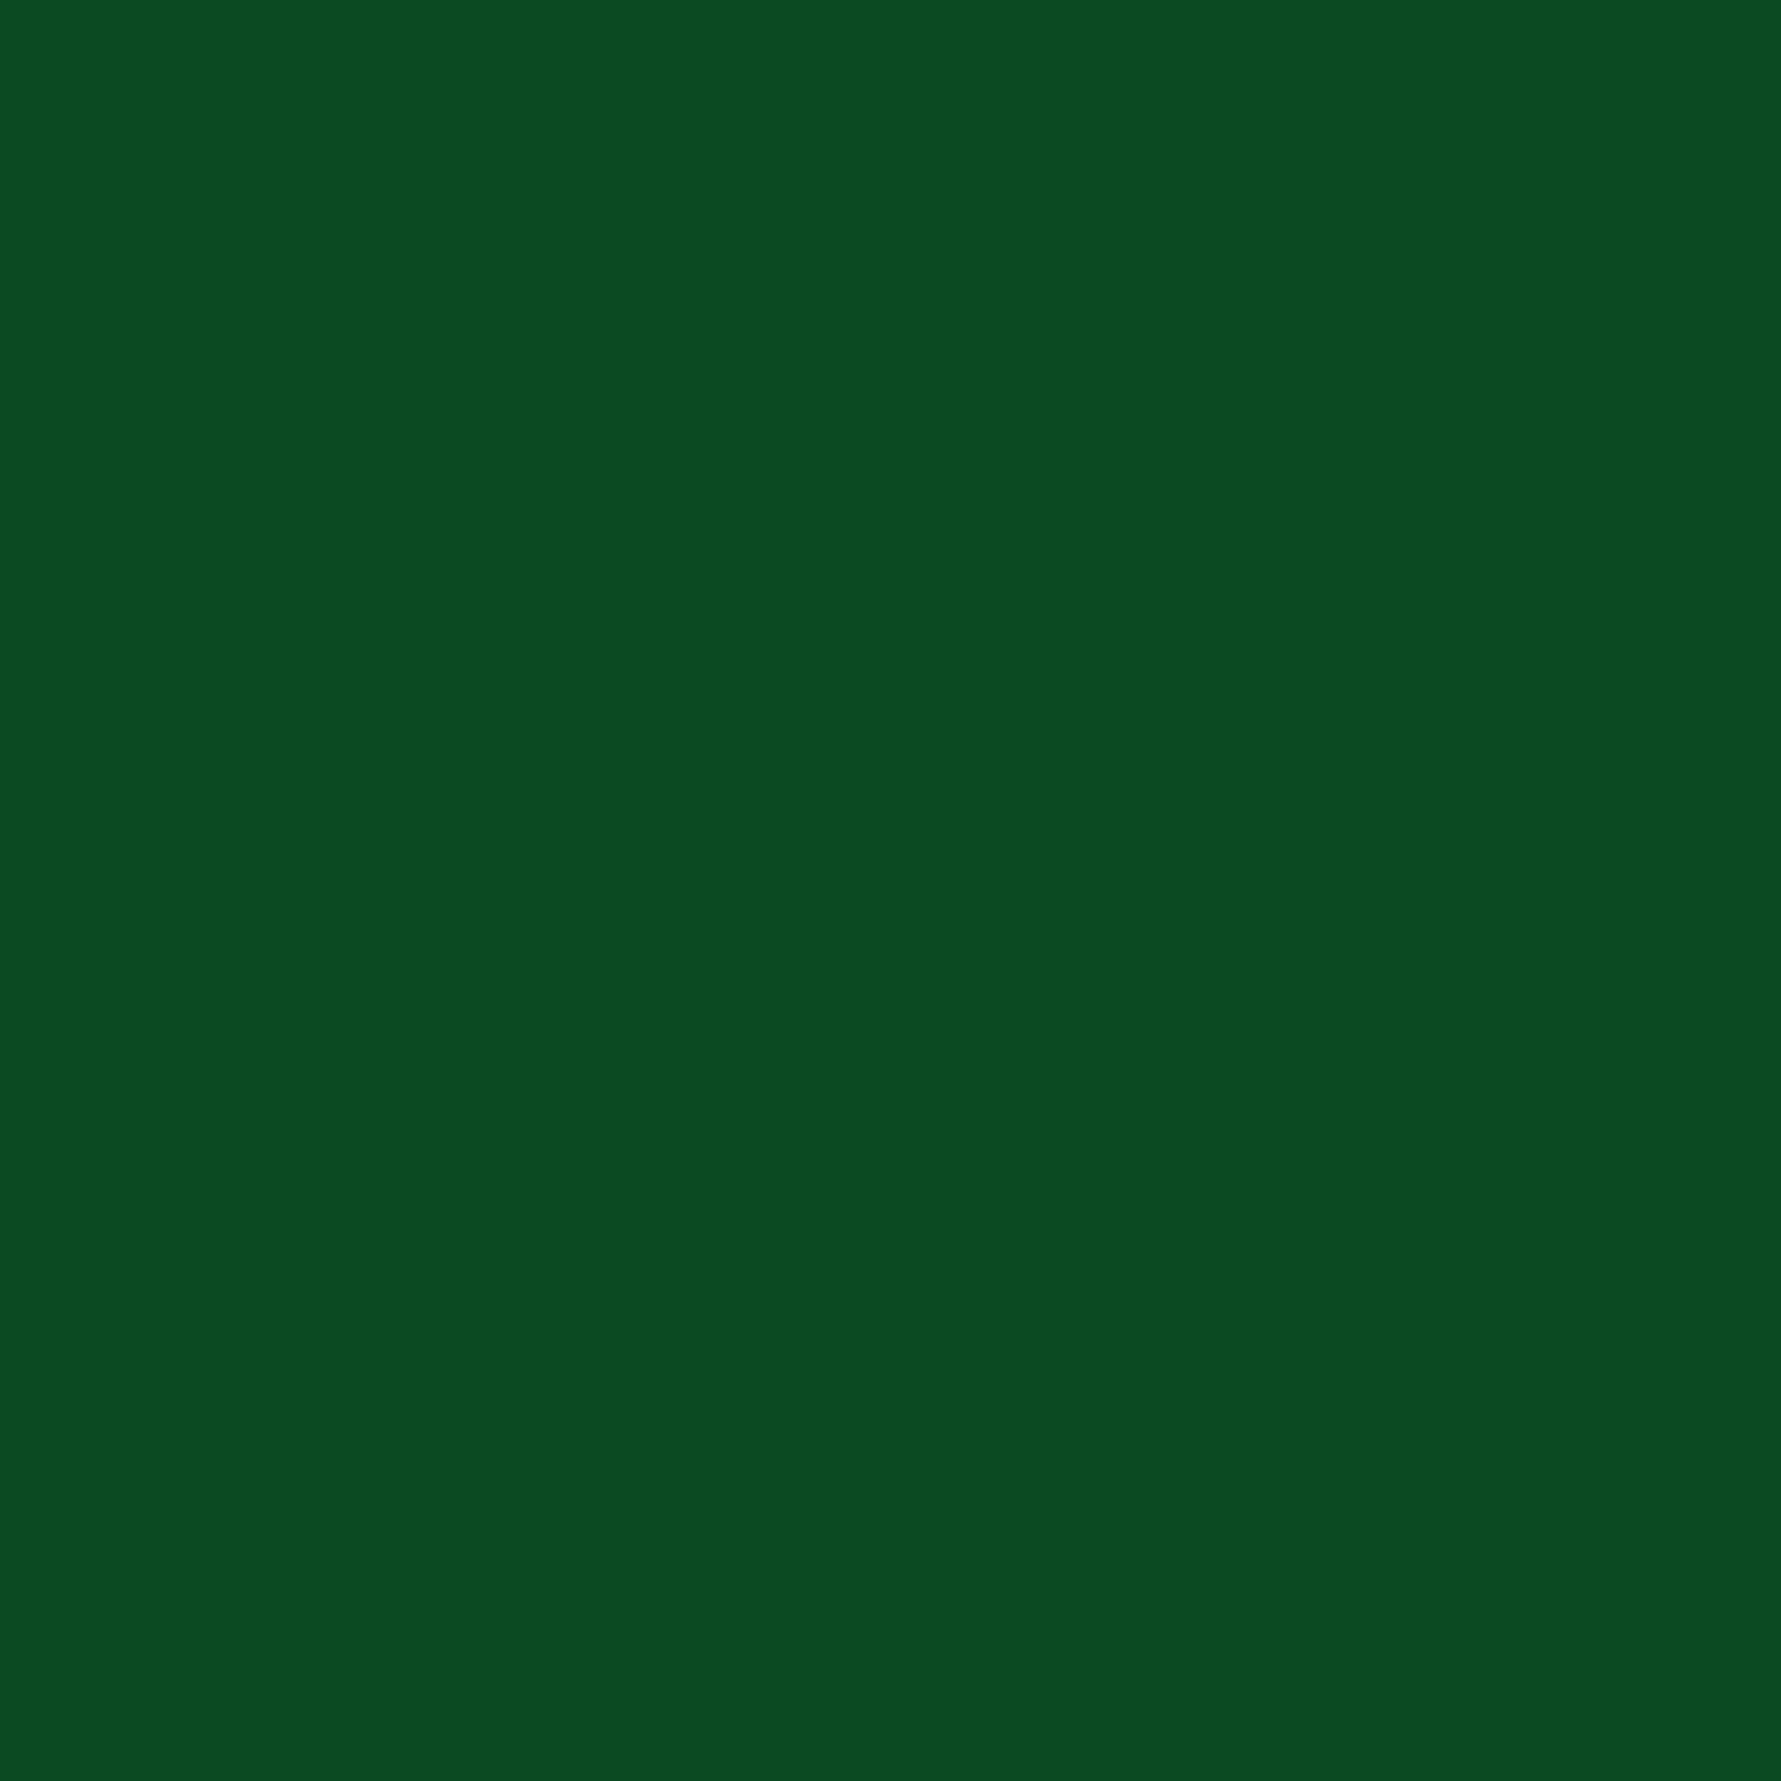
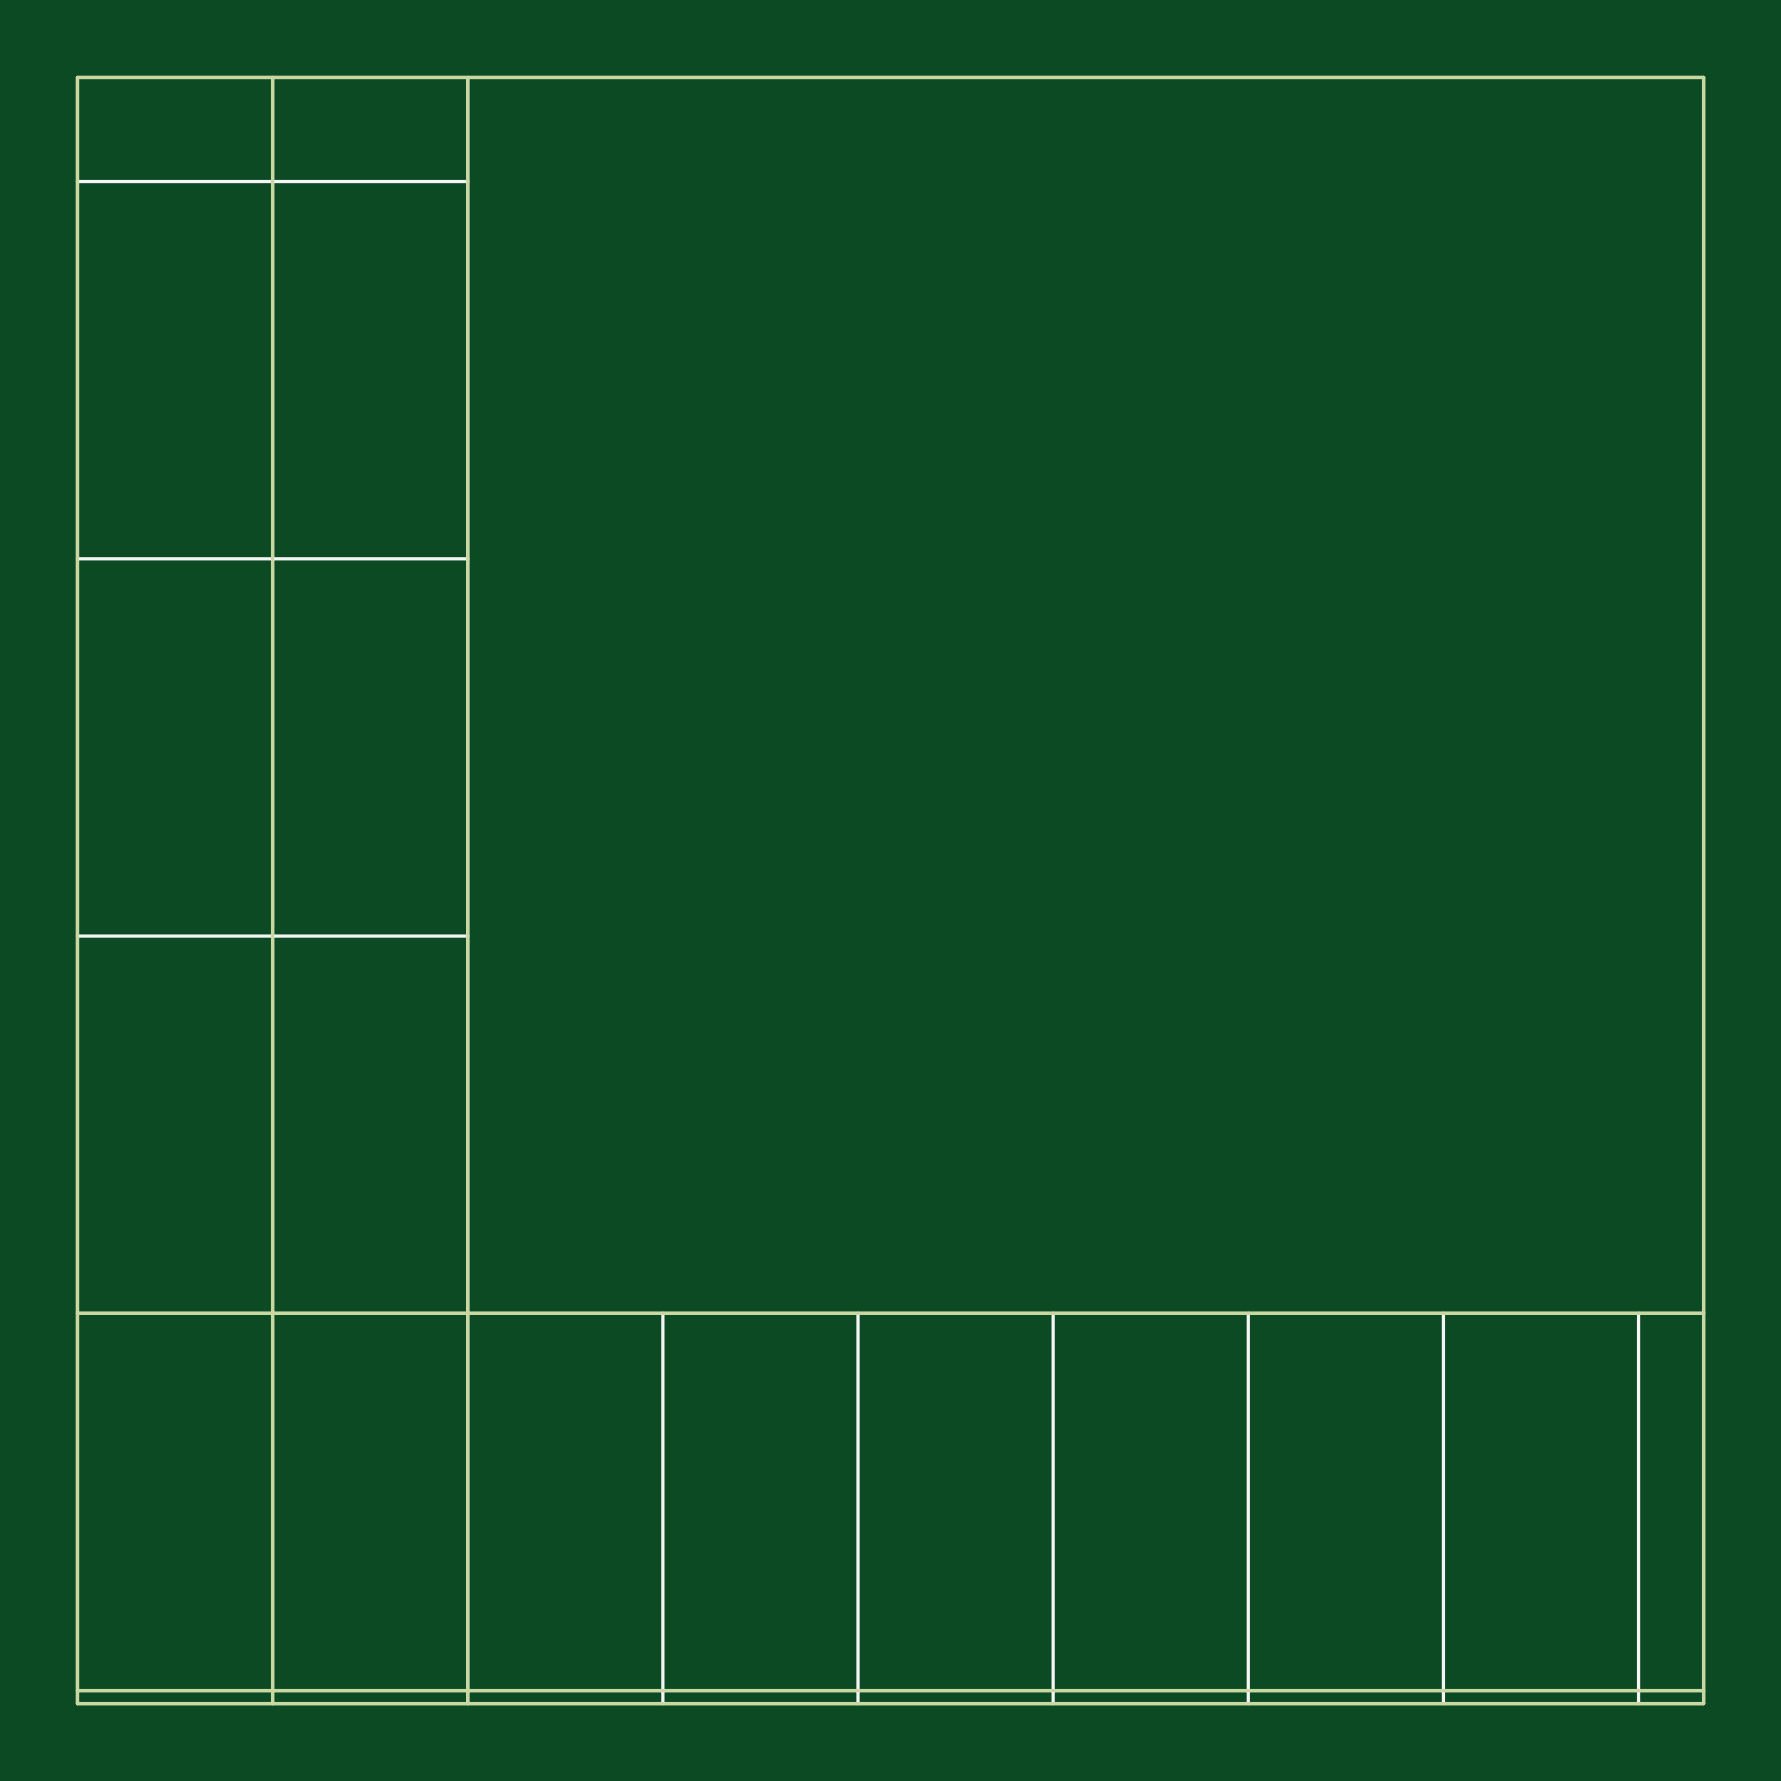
board edge: none -> (272, 77) (272, 1703)
board edge: none -> (467, 77) (467, 1703)
board edge: none -> (1703, 77) (77, 77) (77, 1703) (1703, 1703) (1703, 77)
line: none -> (467, 181) (77, 181)
line: none -> (467, 558) (77, 558)
line: none -> (467, 936) (77, 936)
line: none -> (662, 1313) (662, 1703)
line: none -> (858, 1313) (858, 1703)
line: none -> (1053, 1313) (1053, 1703)
line: none -> (1248, 1313) (1248, 1703)
line: none -> (1443, 1313) (1443, 1703)
line: none -> (1638, 1313) (1638, 1703)
board edge: none -> (1703, 1313) (77, 1313)
board edge: none -> (1703, 1690) (77, 1690)

